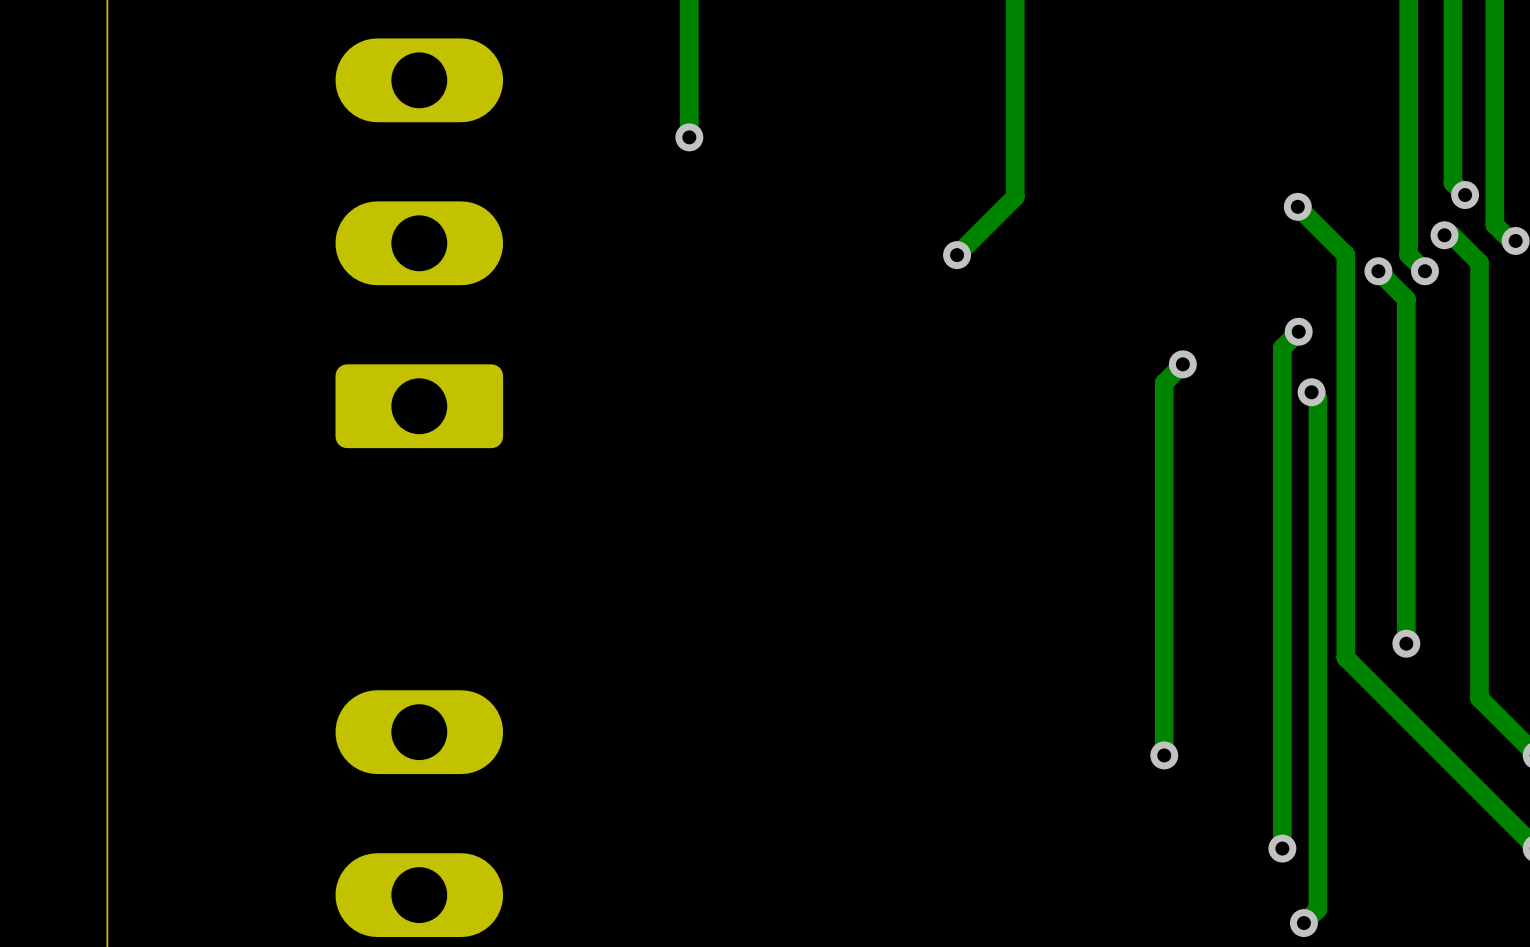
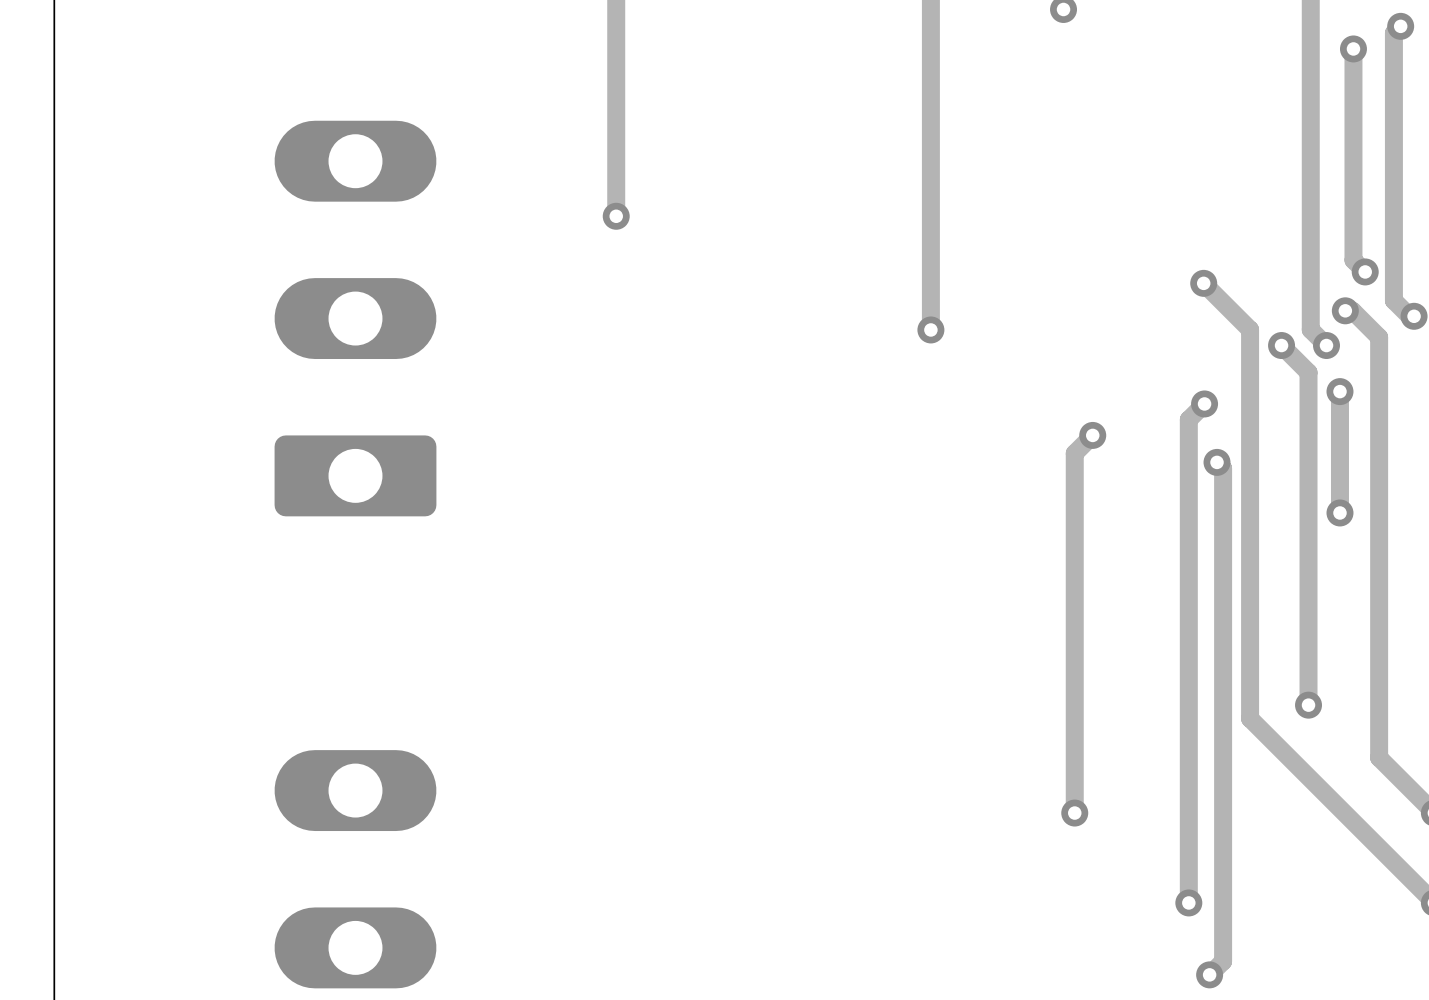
track: (1015, 196) (957, 255) -> (930, 273) (930, 329)
via position: (957, 255) -> (930, 329)
track: none -> (1339, 391) (1339, 512)
via: none -> (1339, 391)
via: none -> (1339, 512)

